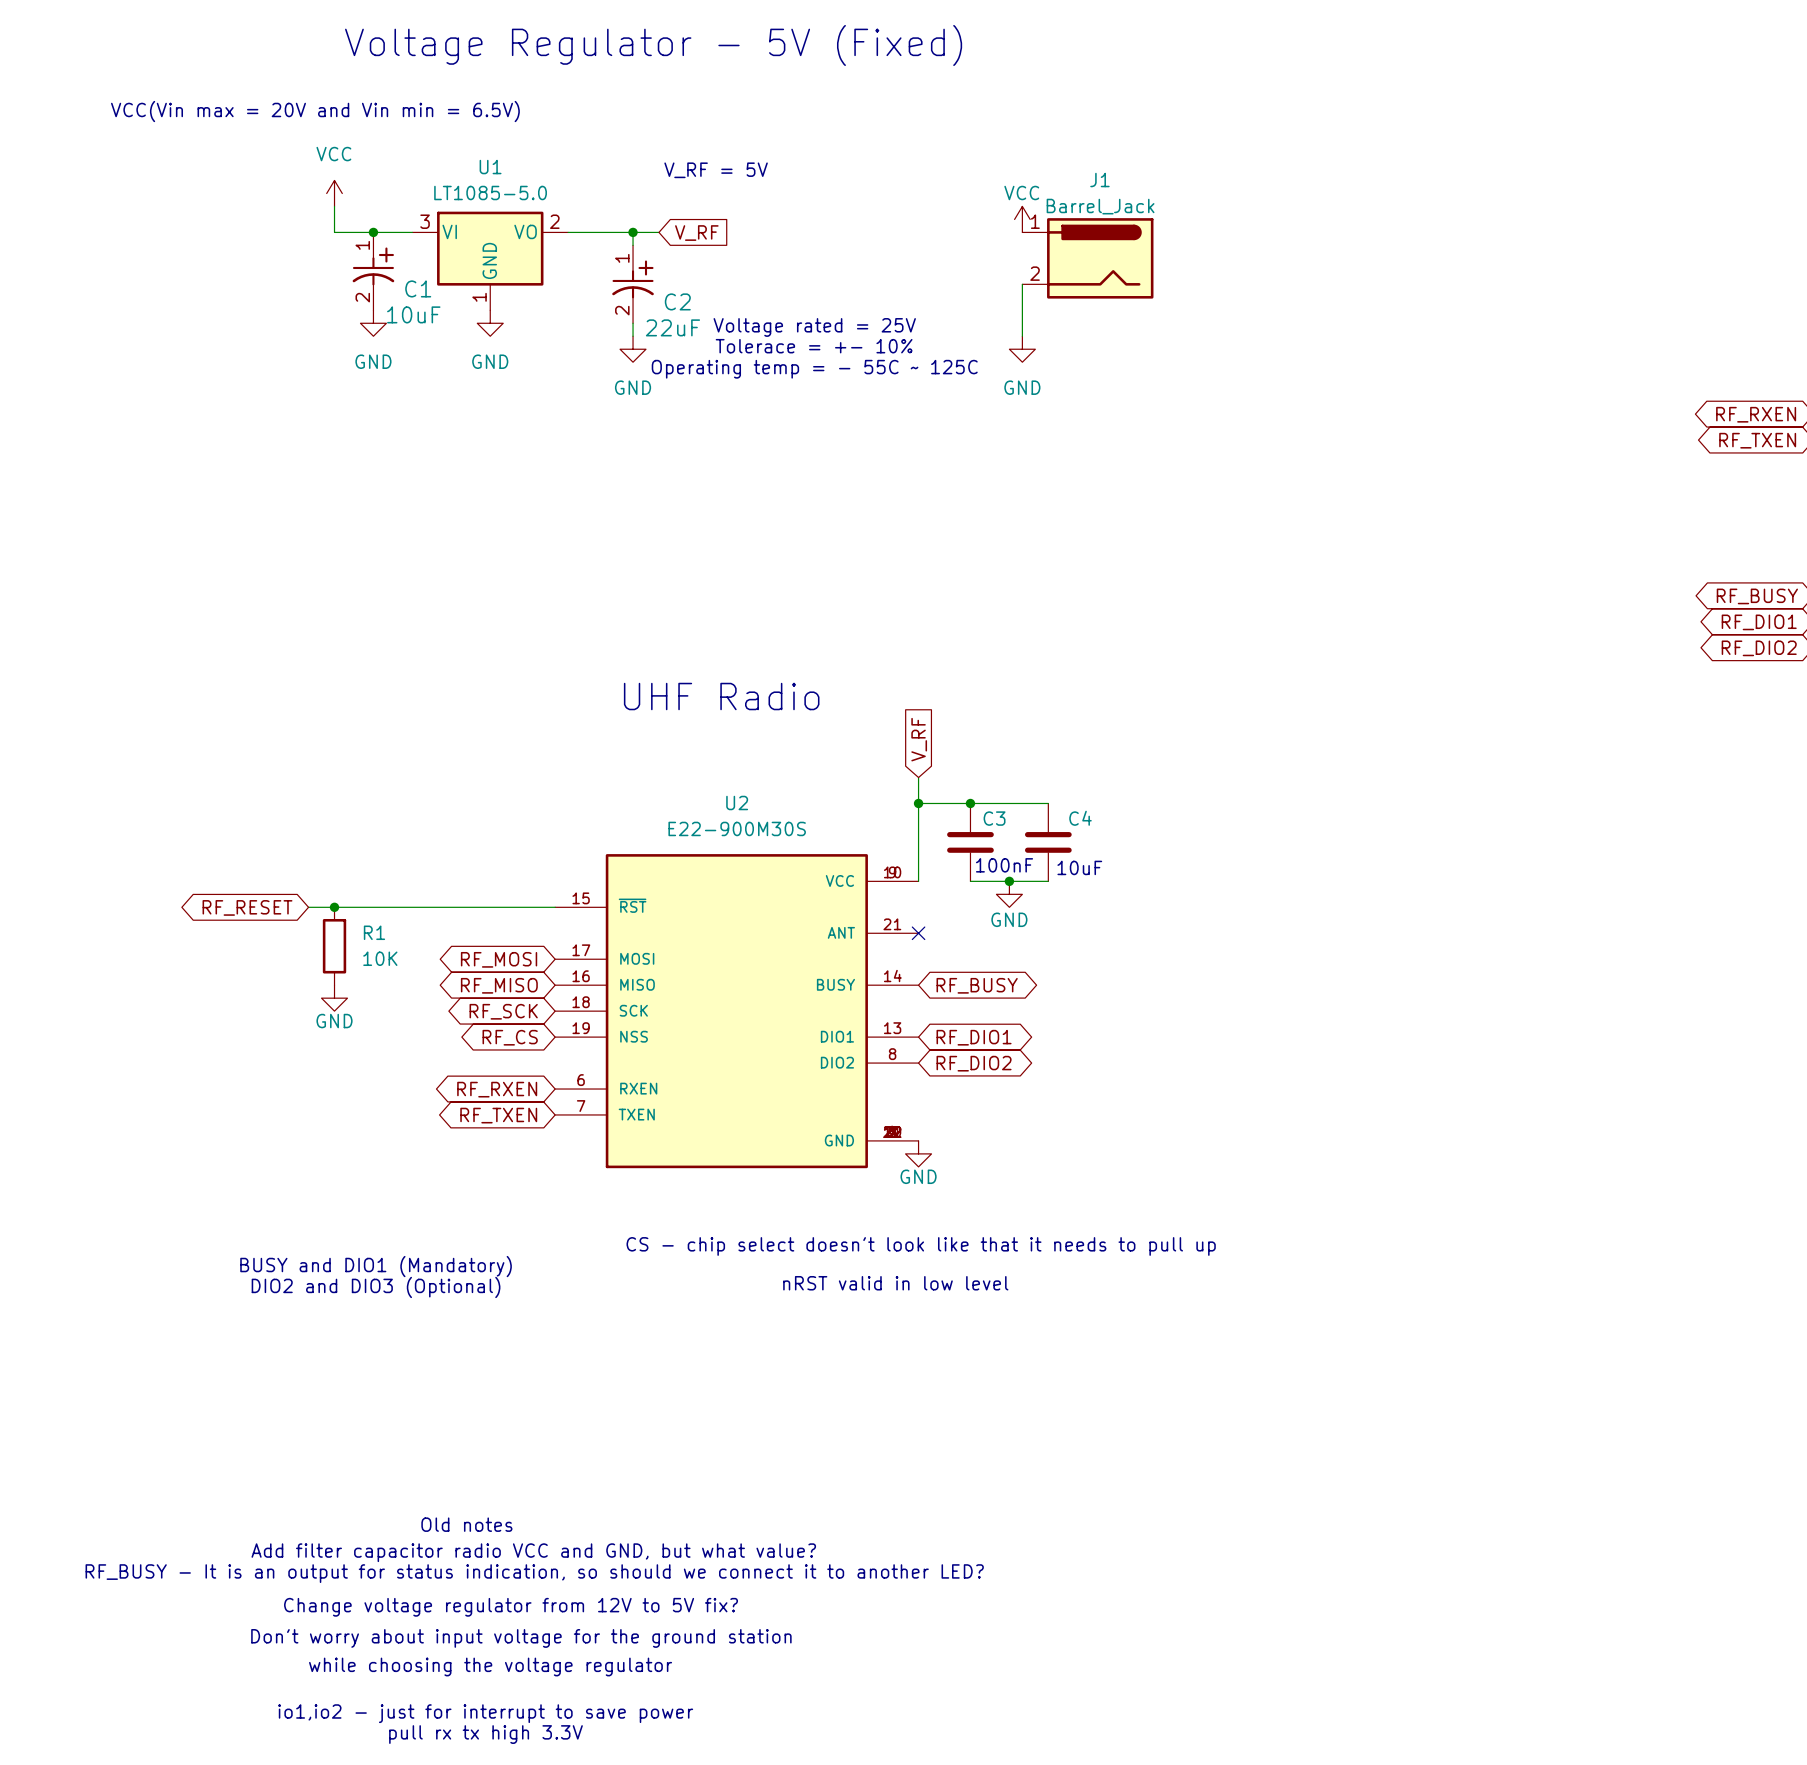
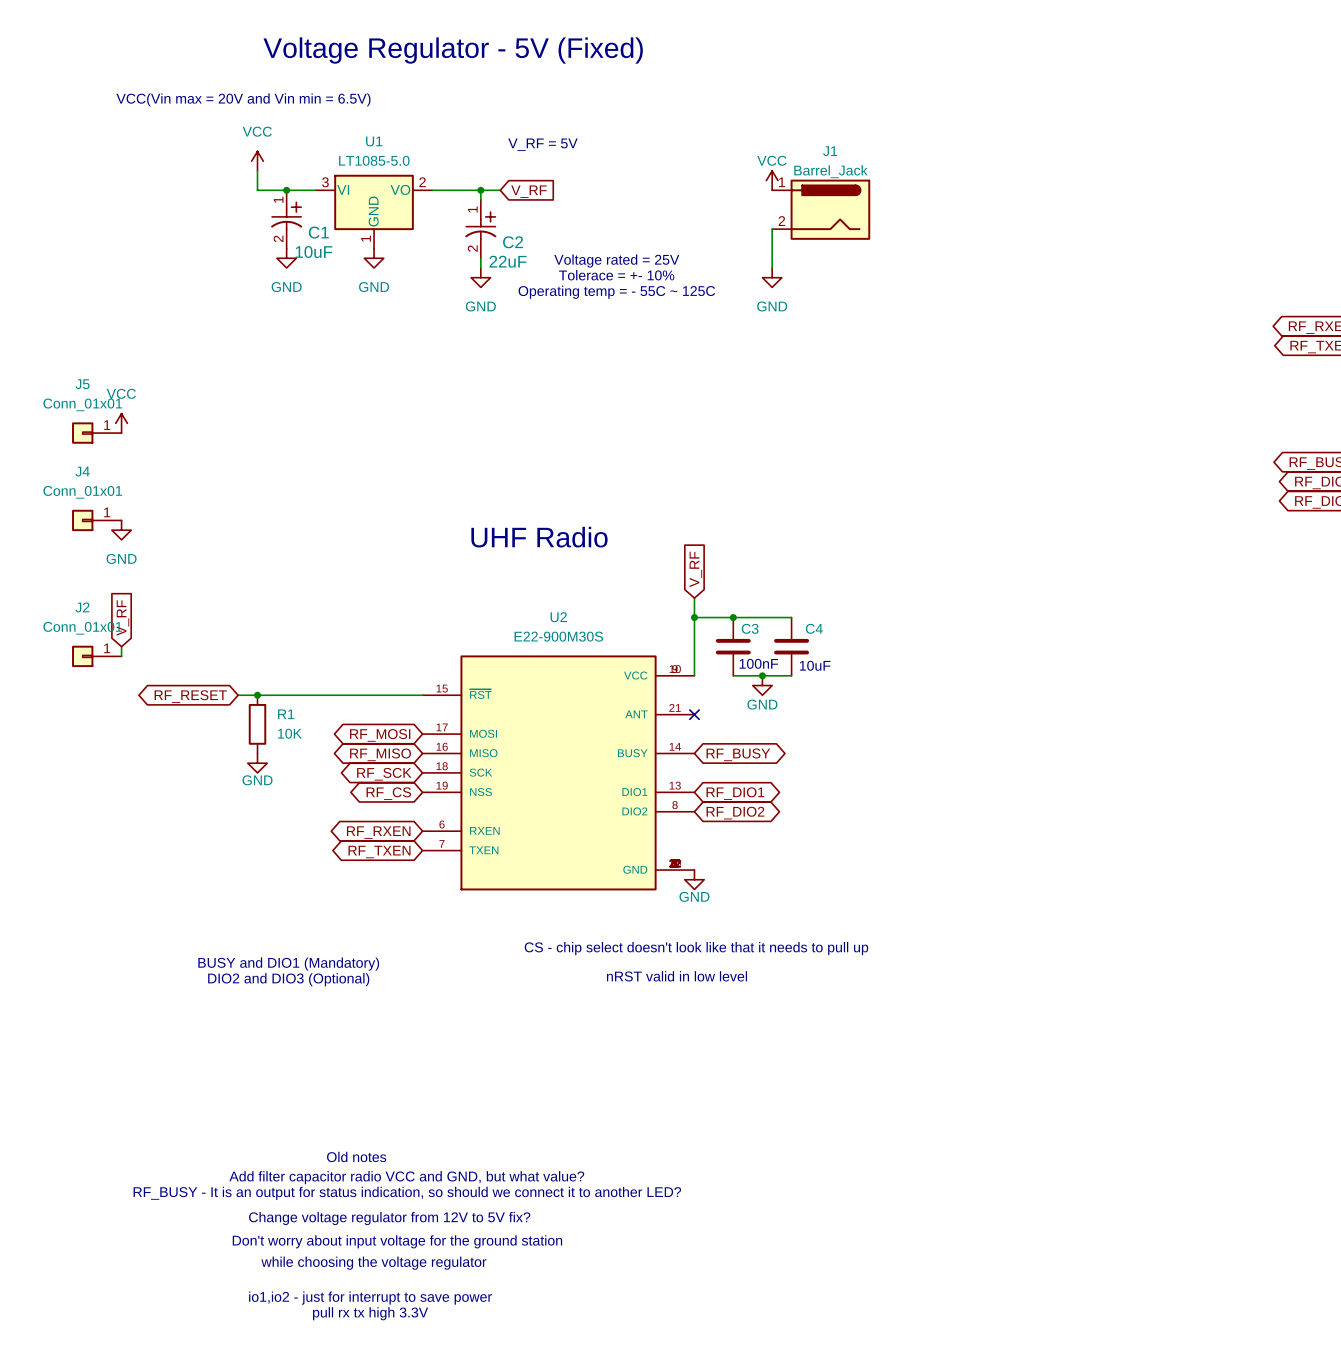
power symbol: none -> VCC (121, 423)
J5: none -> Conn_01x01 (96, 433)
J4: none -> Conn_01x01 (96, 520)
power symbol: none -> GND (121, 530)
global label: none -> V_RF (122, 617)
wire: none -> (121, 646) (121, 656)
J2: none -> Conn_01x01 (96, 656)

